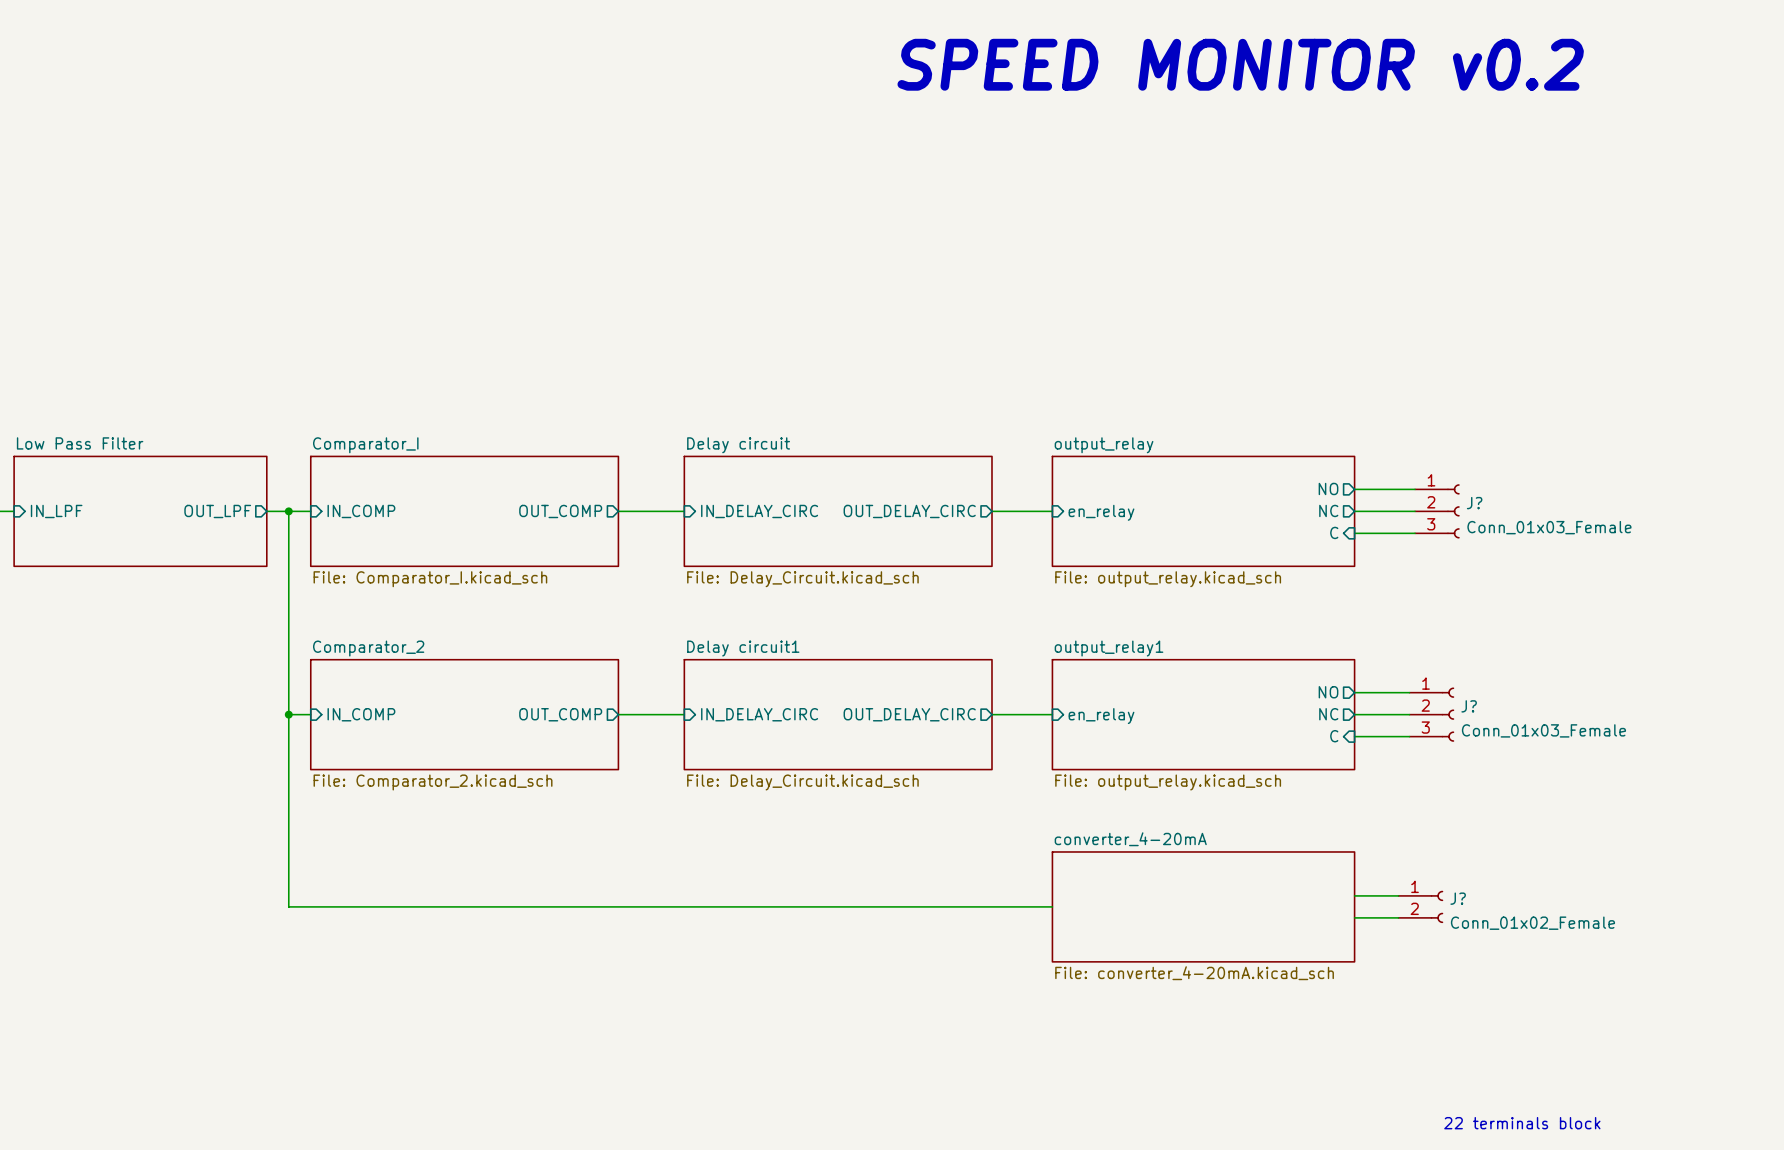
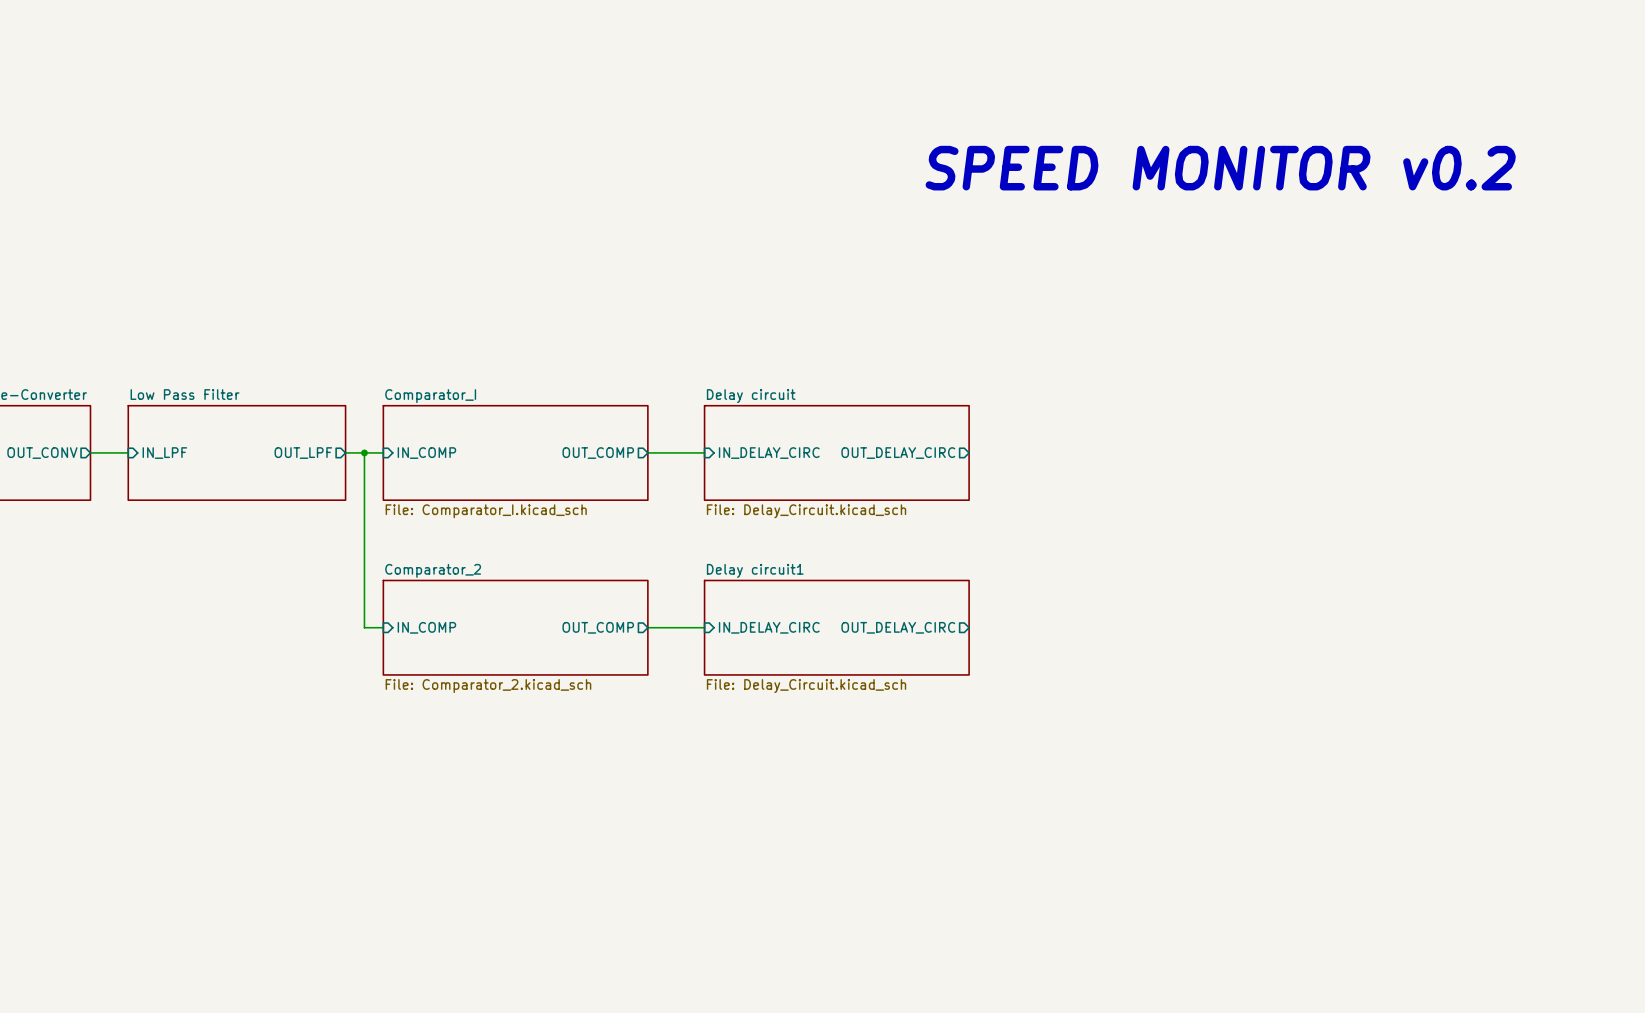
text position: SPEED MONITOR v0.2 (1240, 64) -> SPEED MONITOR v0.2 (1220, 168)
sheet pin: NO (1328, 488) -> none
wire: (1354, 489) (1415, 489) -> none
sheet pin: NC (1328, 510) -> none
wire: (991, 511) (1052, 511) -> none
sheet output_relay: File: output_relay.kicad_sch (1203, 511) -> none
wire: (1354, 511) (1415, 511) -> none
J?: Conn_01x03_Female (1437, 511) -> none
sheet pin: en_relay (1101, 512) -> none
sheet pin: C (1334, 532) -> none
wire: (1354, 533) (1415, 533) -> none
sheet pin: NO (1328, 692) -> none
wire: (1354, 692) (1409, 692) -> none
wire: (288, 714) (288, 906) (1052, 906) -> none
junction: (288, 714) -> none
wire: (991, 714) (1052, 714) -> none
sheet output_relay1: File: output_relay.kicad_sch (1203, 714) -> none
sheet pin: NC (1328, 714) -> none
wire: (1354, 714) (1409, 714) -> none
J?: Conn_01x03_Female (1431, 714) -> none
sheet pin: en_relay (1101, 716) -> none
sheet pin: C (1334, 736) -> none
wire: (1354, 736) (1409, 736) -> none
wire: (1354, 895) (1398, 895) -> none
sheet converter_4-20mA: File: converter_4-20mA.kicad_sch (1203, 906) -> none
J?: Conn_01x02_Female (1420, 906) -> none
wire: (1354, 917) (1398, 917) -> none
text: 22 terminals block (1522, 1123) -> none

